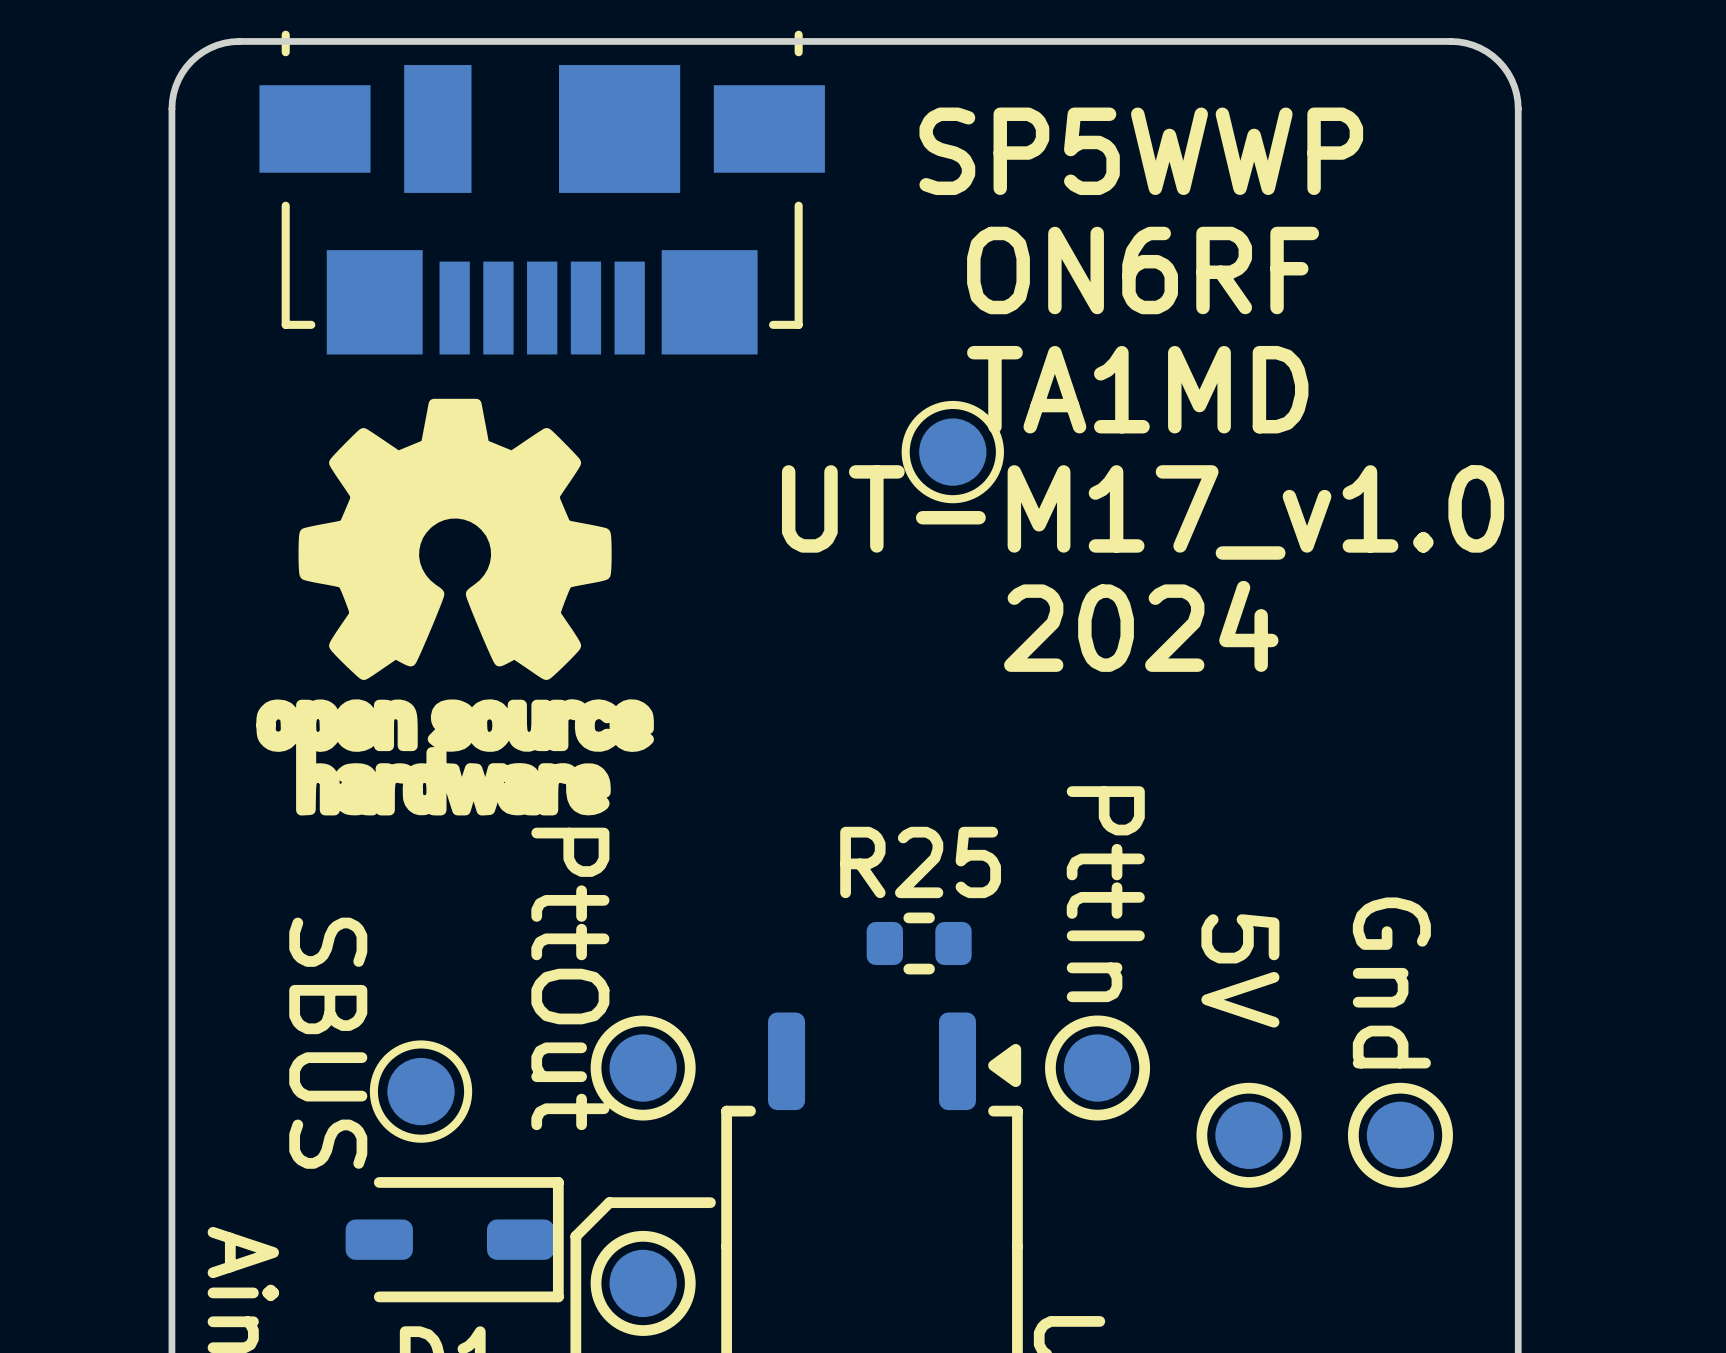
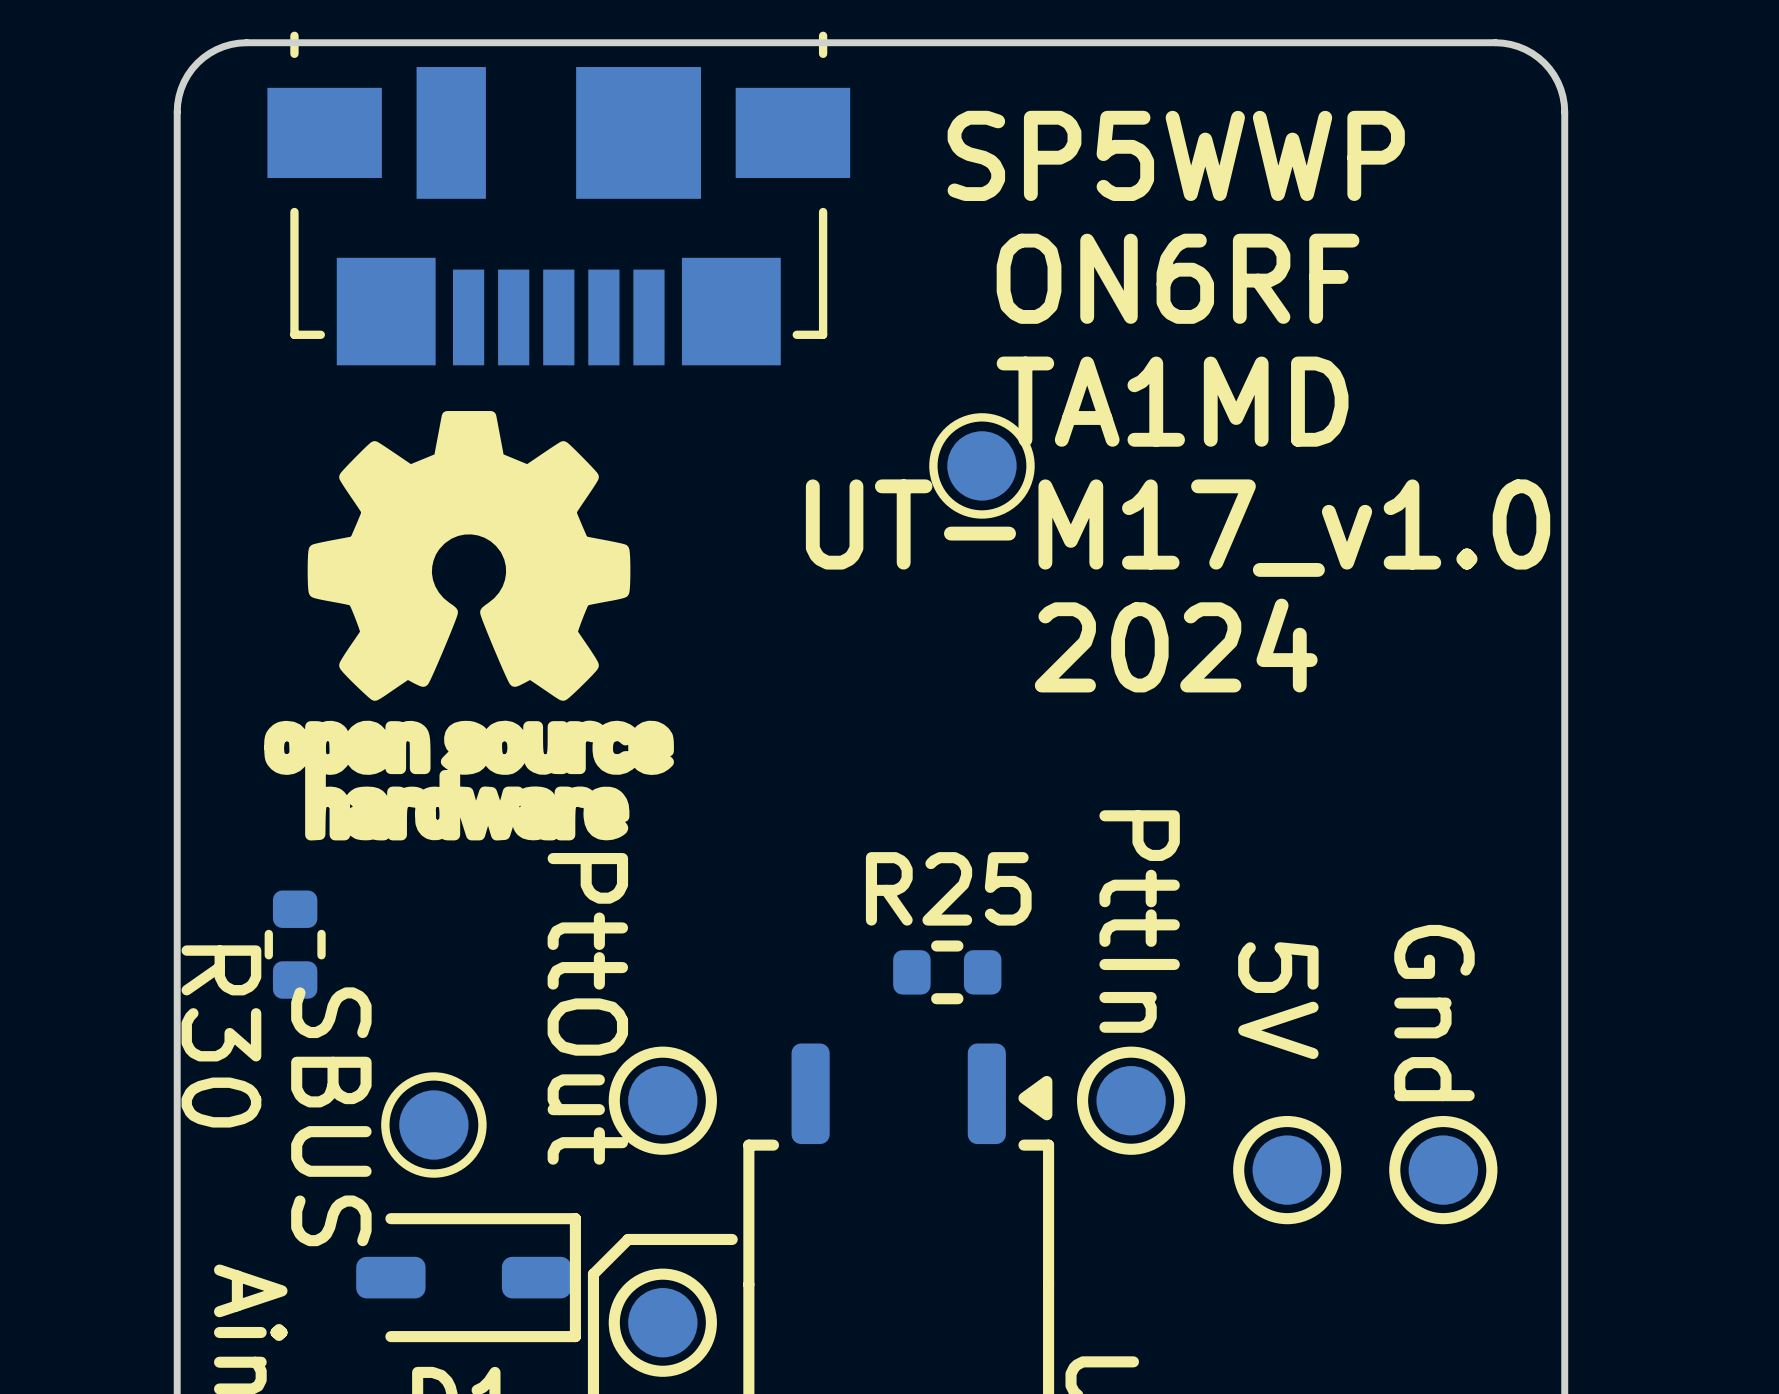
R30: none -> (295, 944)
text position: SBUS (328, 1043) -> SBUS (331, 1116)

